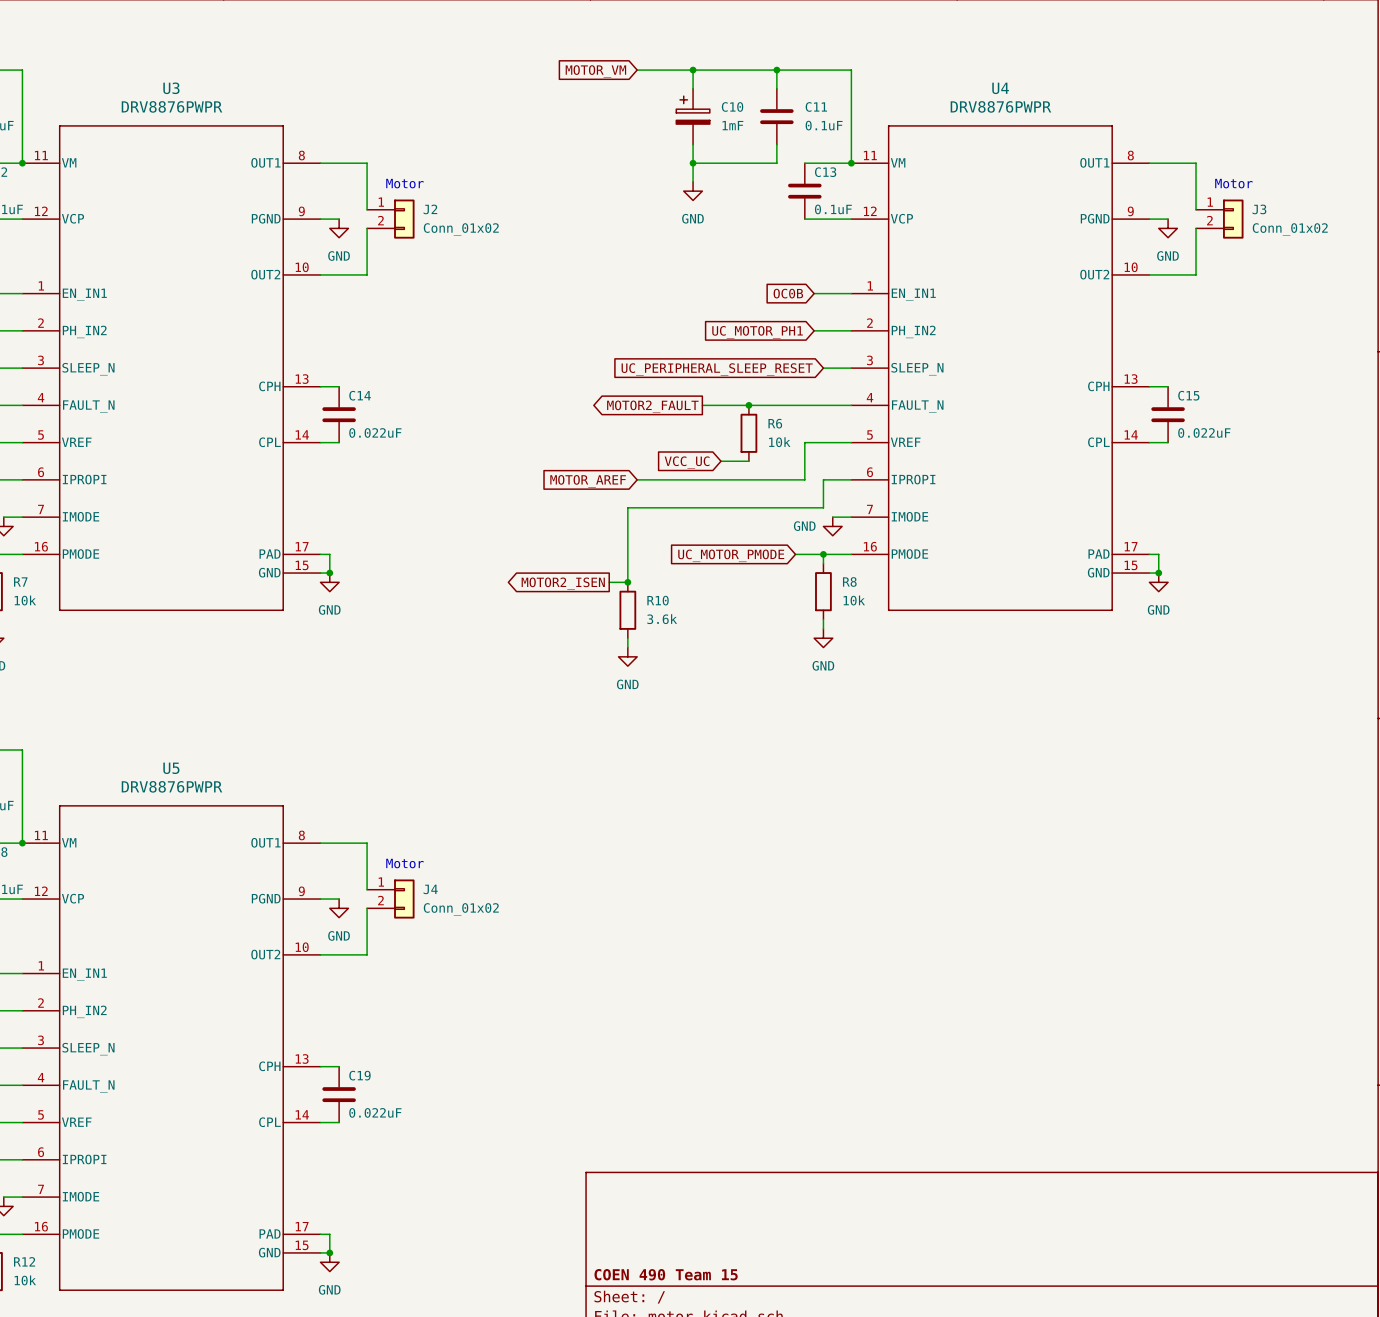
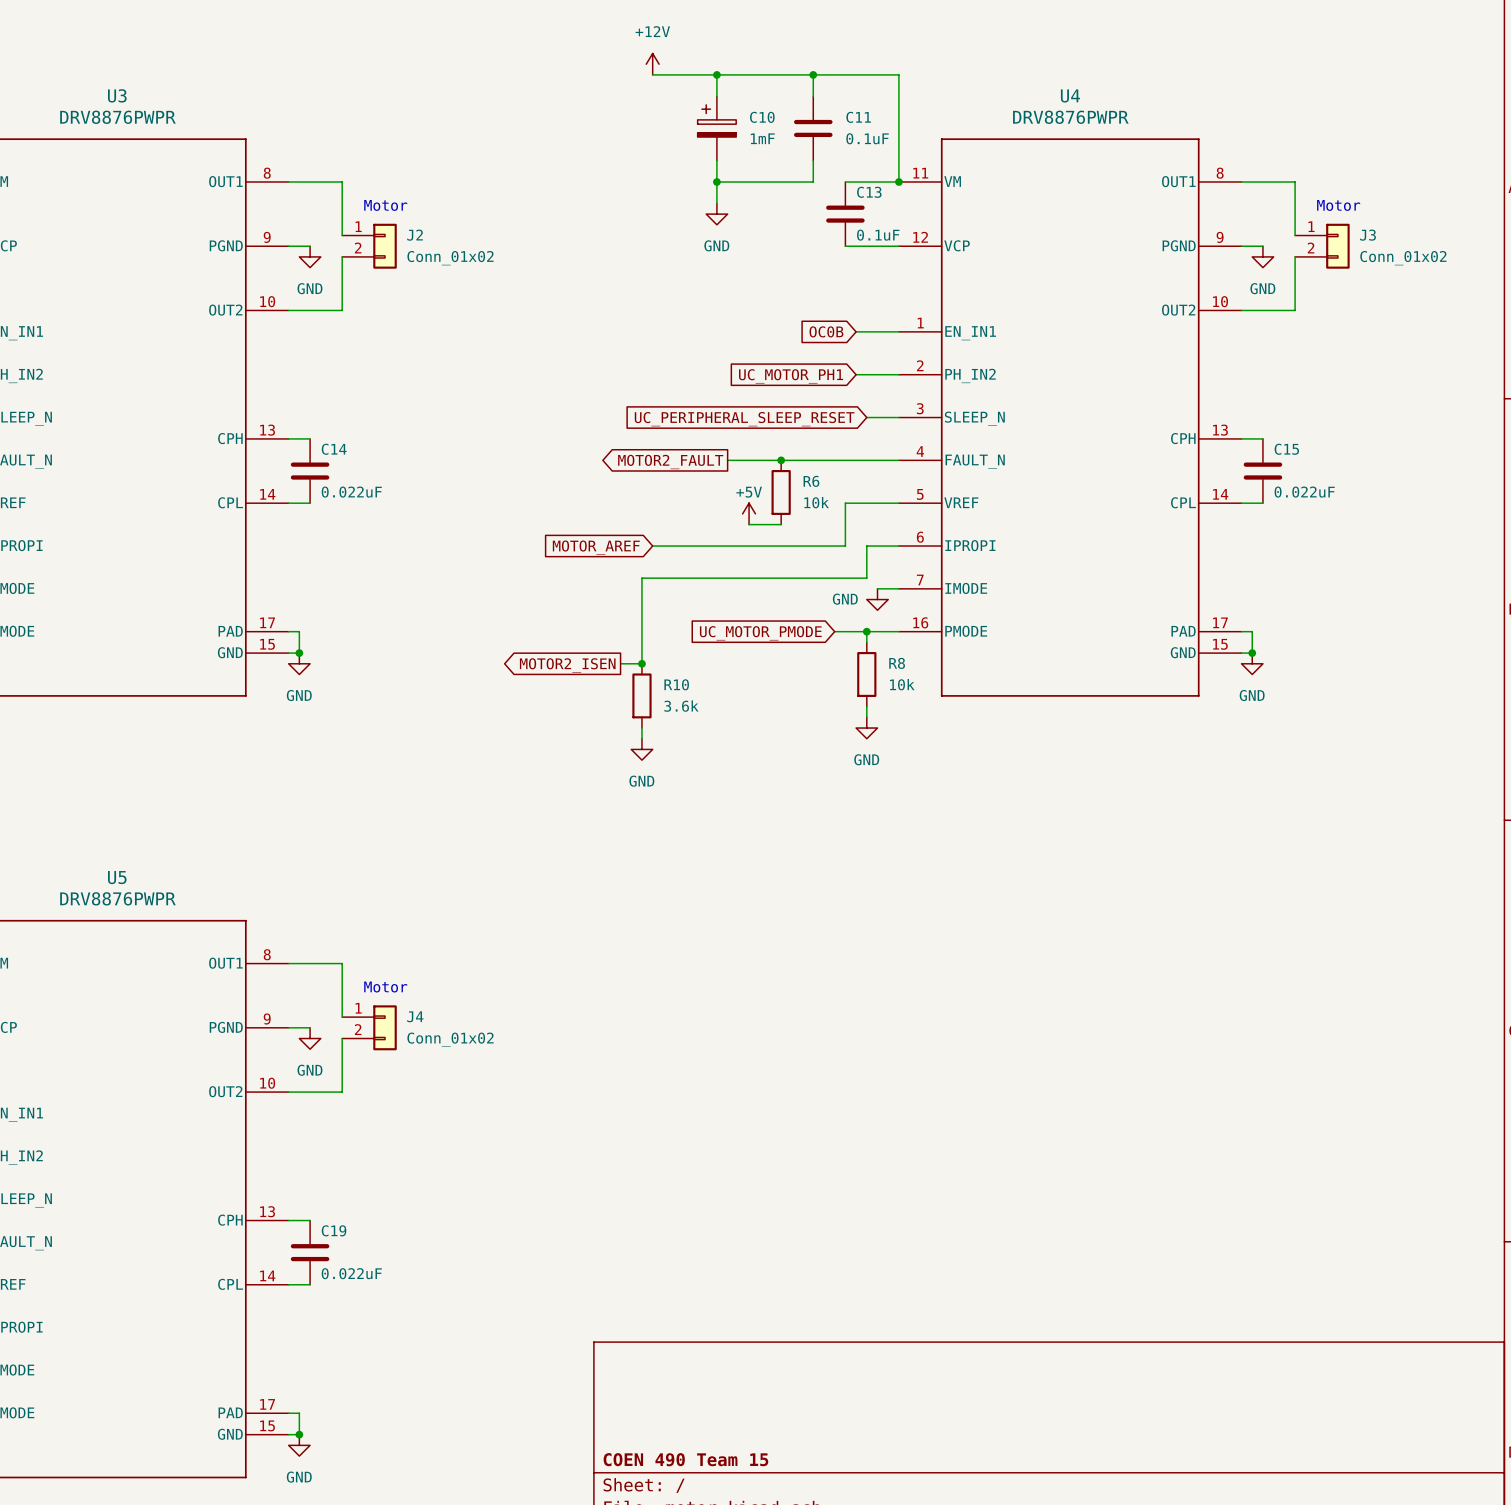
power symbol: none -> +12V (652, 64)
global label: MOTOR_VM (595, 71) -> none
power symbol: none -> +5V (749, 513)
global label: VCC_UC (687, 462) -> none

